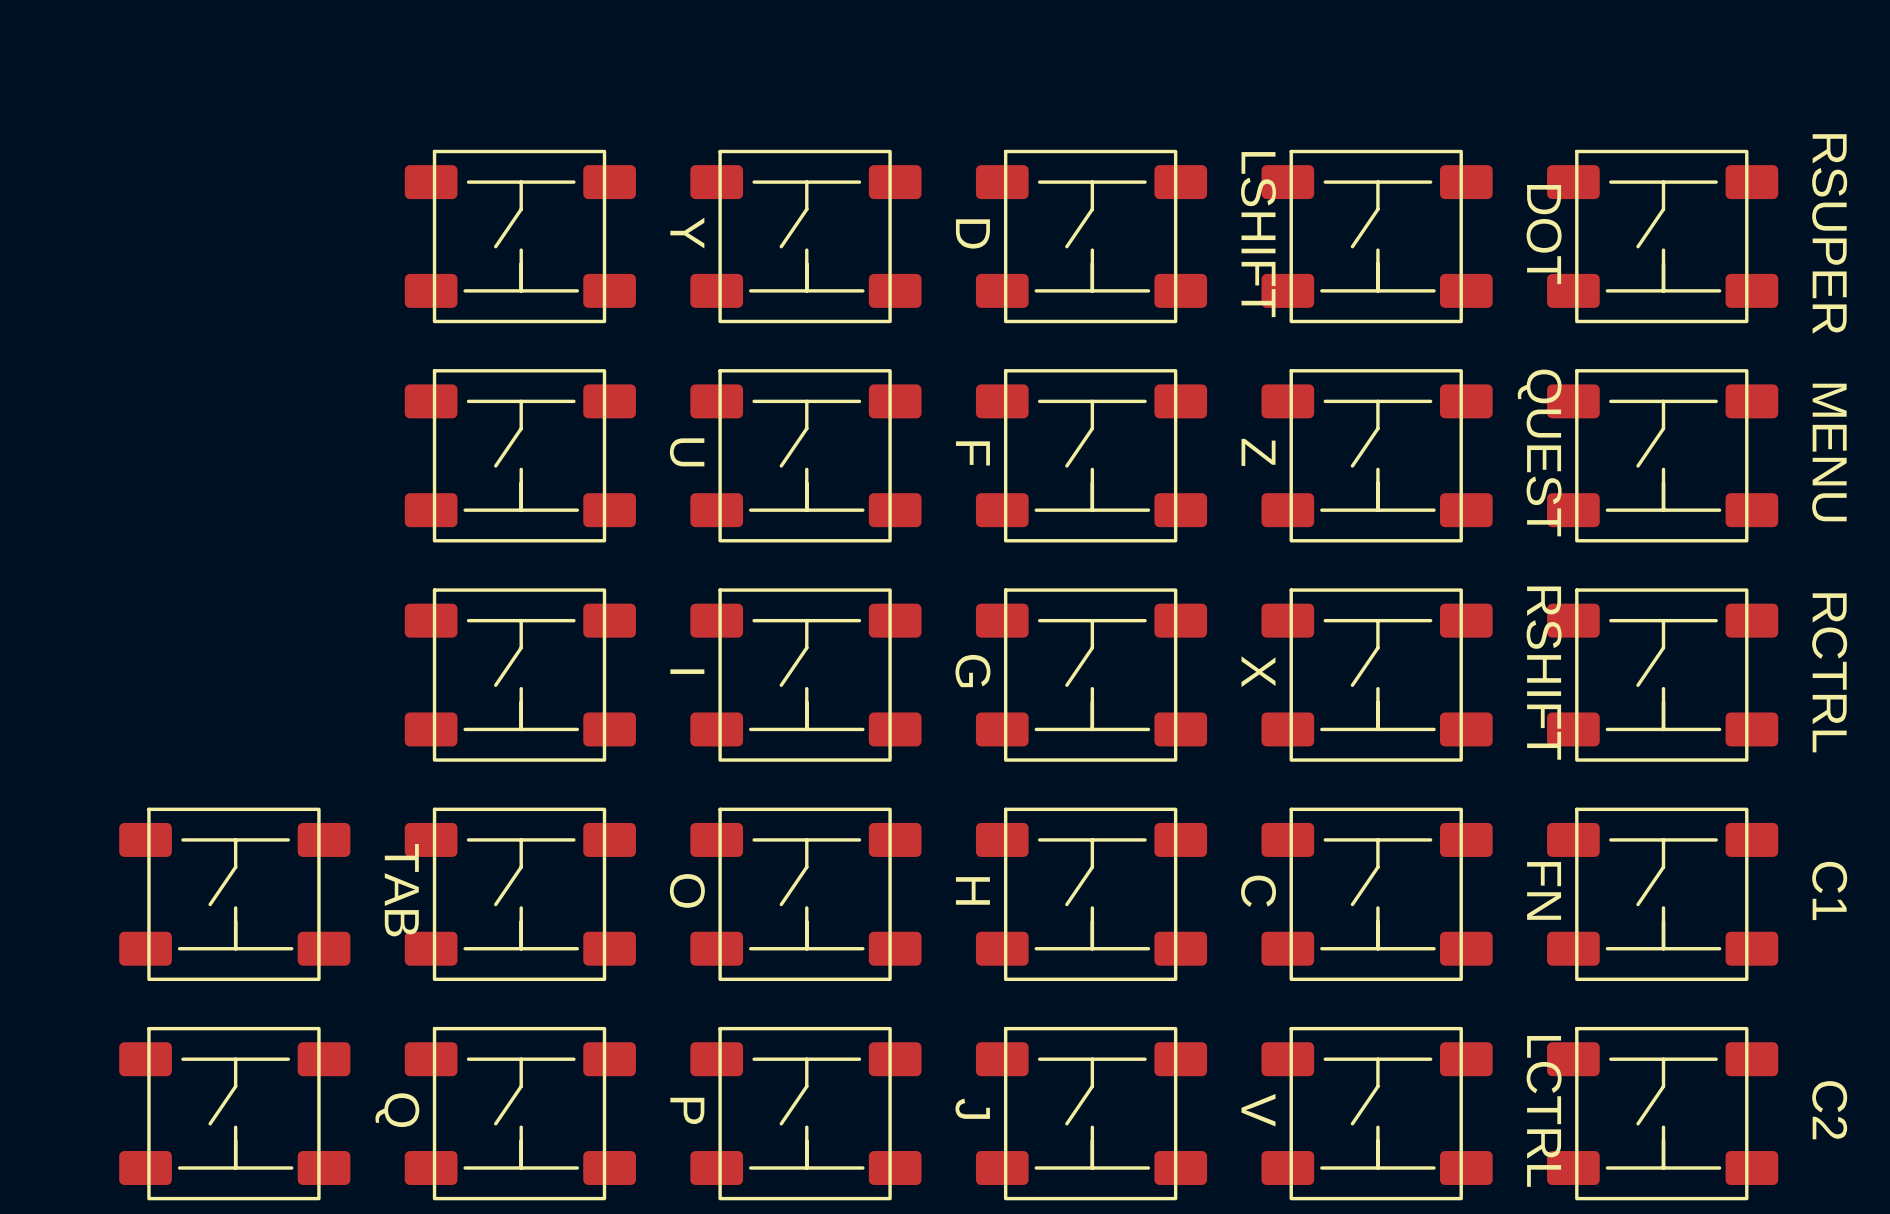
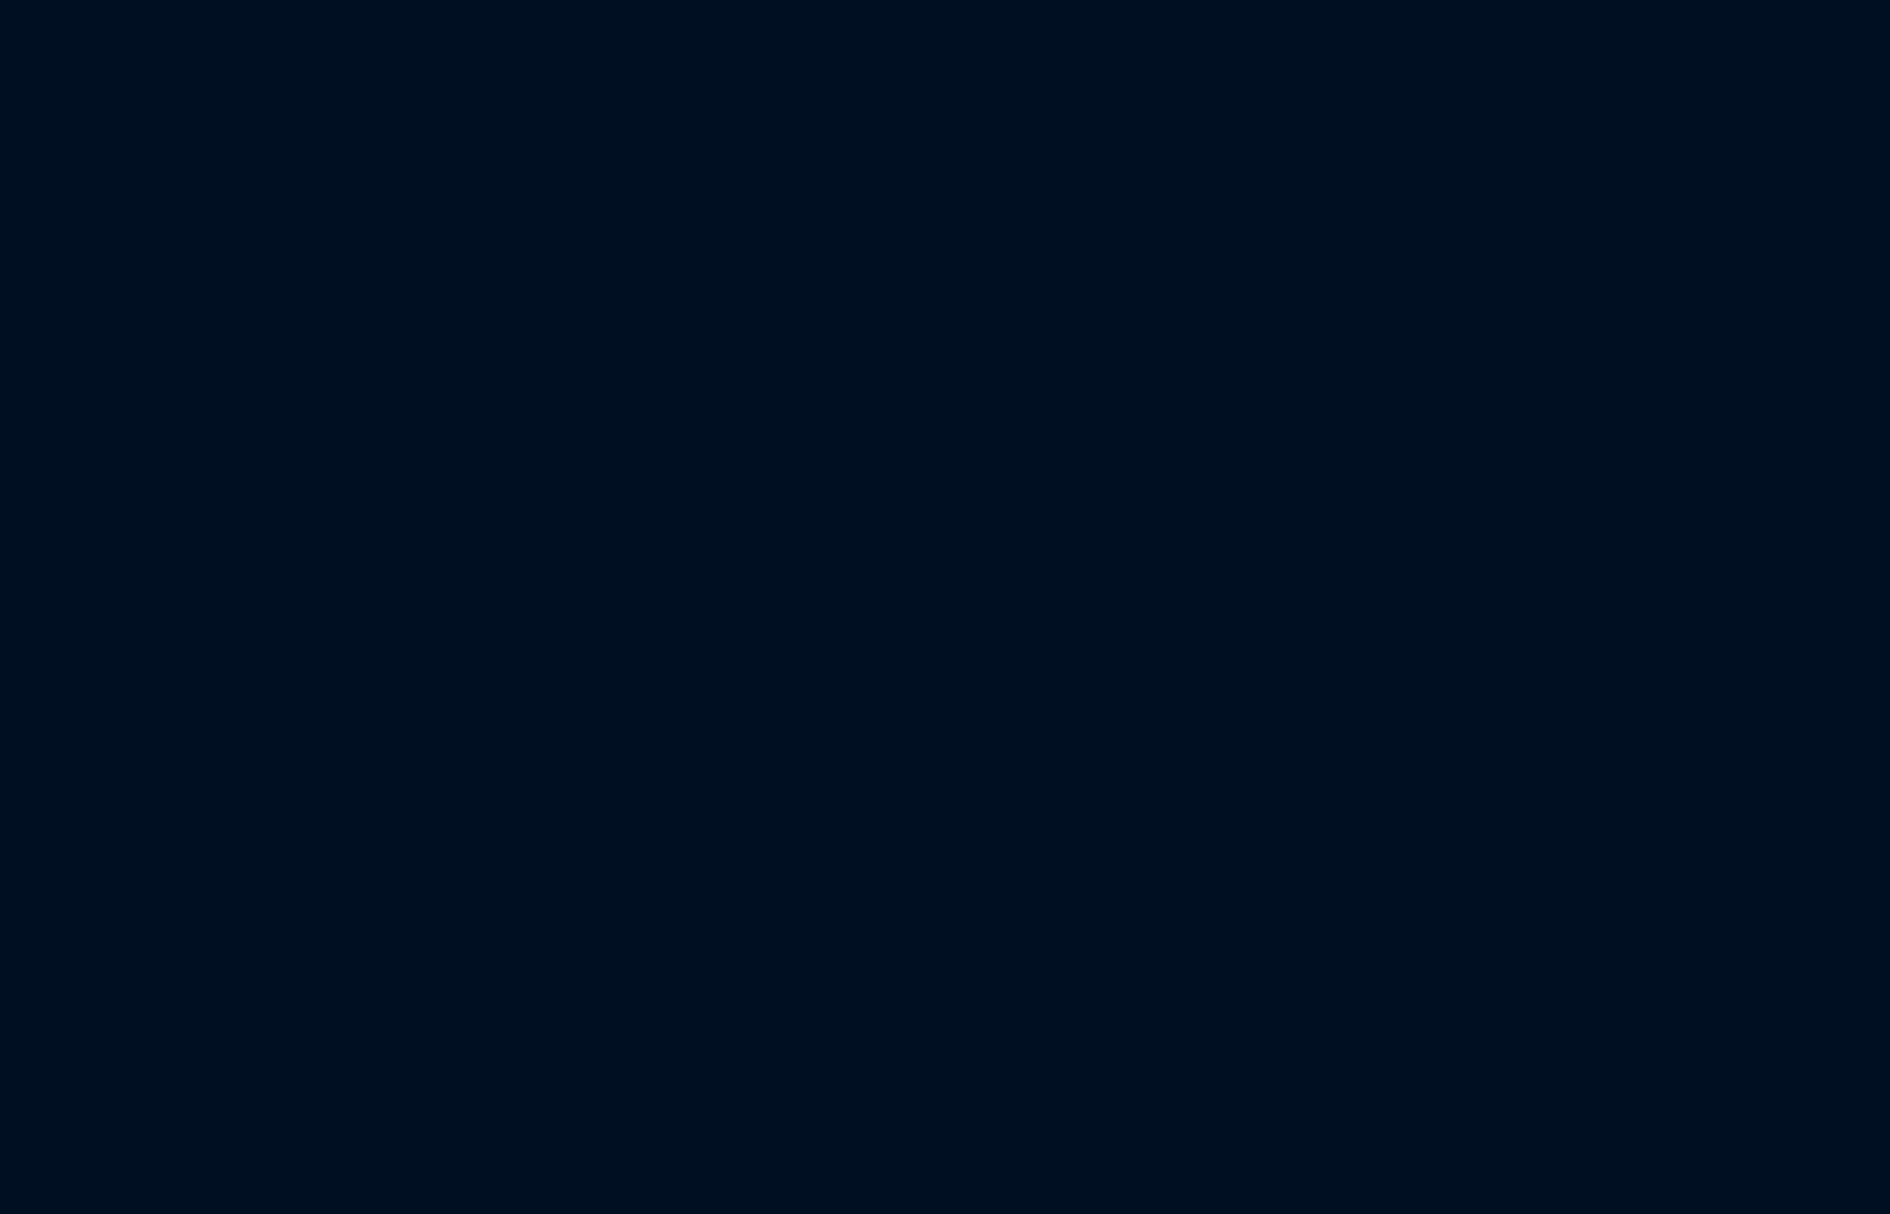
part: Y (520, 236) -> none
part: D (805, 236) -> none
part: LSHIFT (1091, 236) -> none
part: DOT (1377, 236) -> none
part: RSUPER (1662, 236) -> none
part: U (520, 455) -> none
part: F (805, 455) -> none
part: Z (1091, 455) -> none
part: QUEST (1377, 455) -> none
part: MENU (1662, 455) -> none
part: I (520, 675) -> none
part: G (805, 675) -> none
part: X (1091, 675) -> none
part: RSHIFT (1377, 675) -> none
part: RCTRL (1662, 675) -> none
part: TAB (234, 894) -> none
part: O (520, 894) -> none
part: H (805, 894) -> none
part: C (1091, 894) -> none
part: FN (1377, 894) -> none
part: C1 (1662, 894) -> none
part: Q (234, 1113) -> none
part: P (520, 1113) -> none
part: J (805, 1113) -> none
part: V (1091, 1113) -> none
part: LCTRL (1377, 1113) -> none
part: C2 (1662, 1113) -> none

